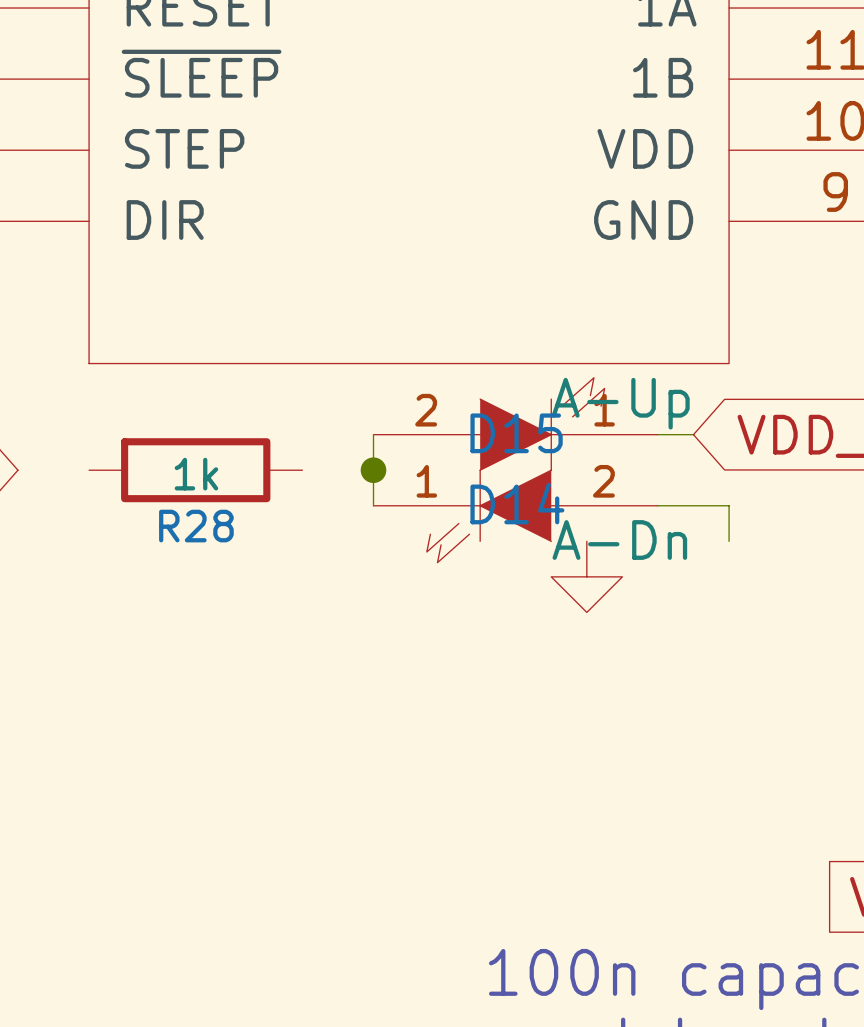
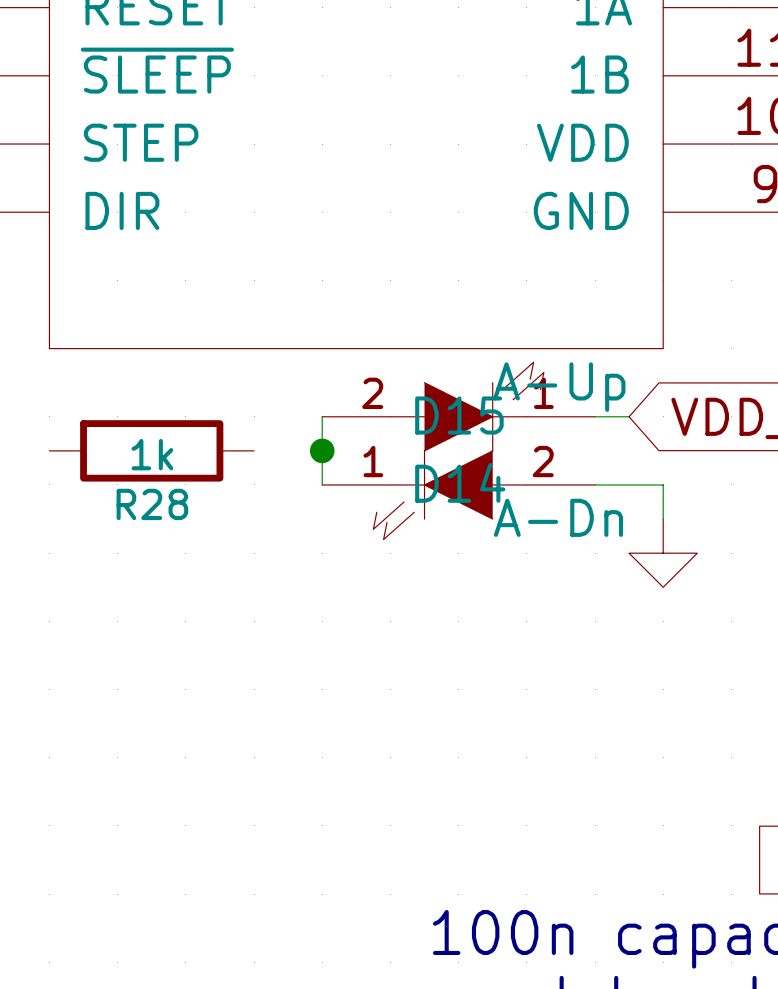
power symbol position: (586, 576) -> (663, 553)

